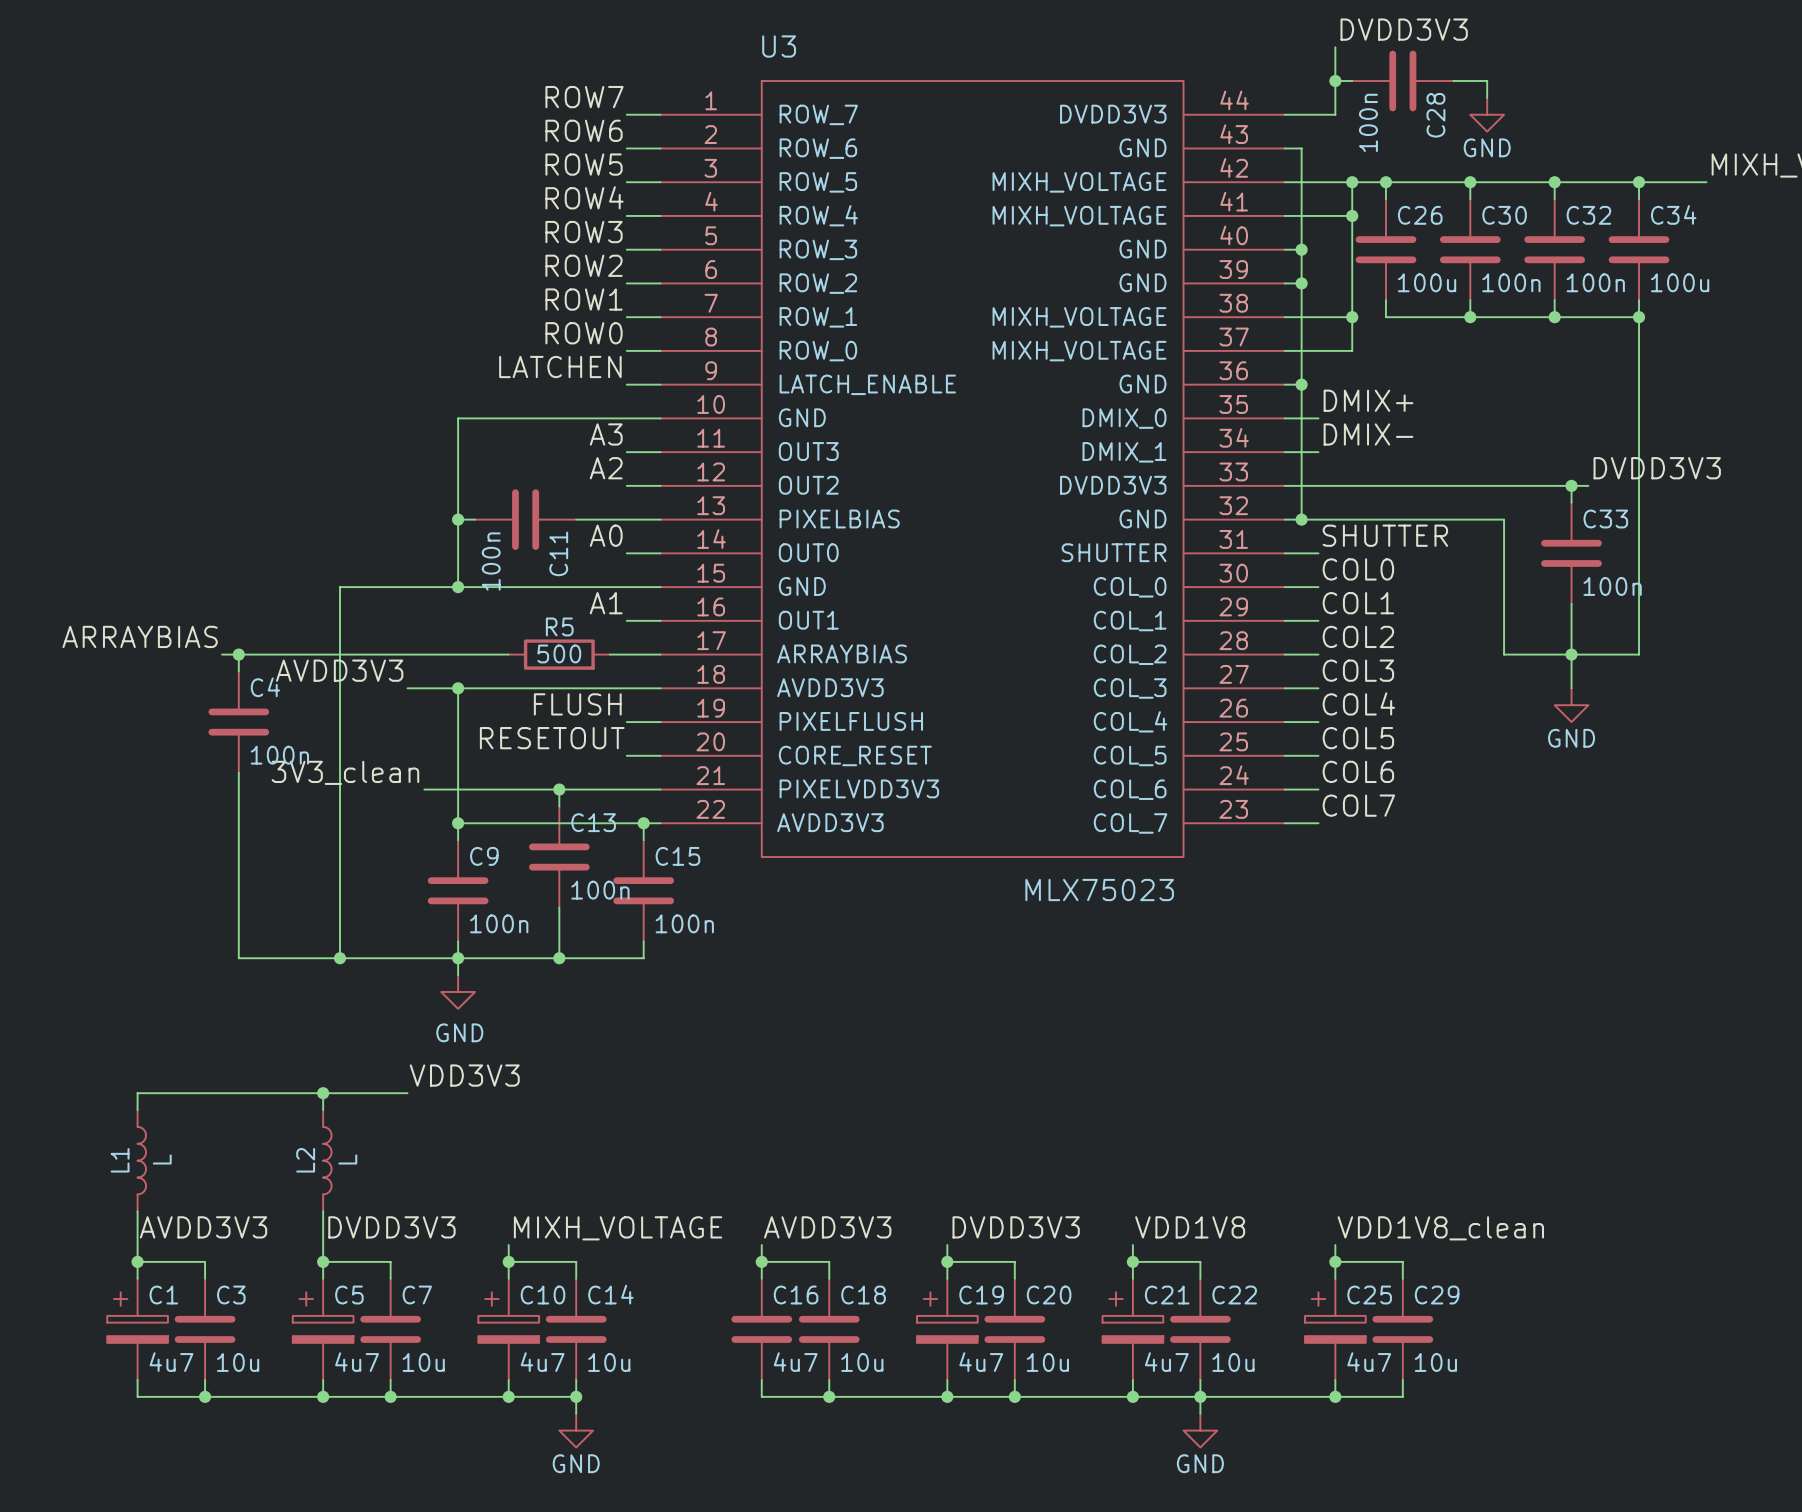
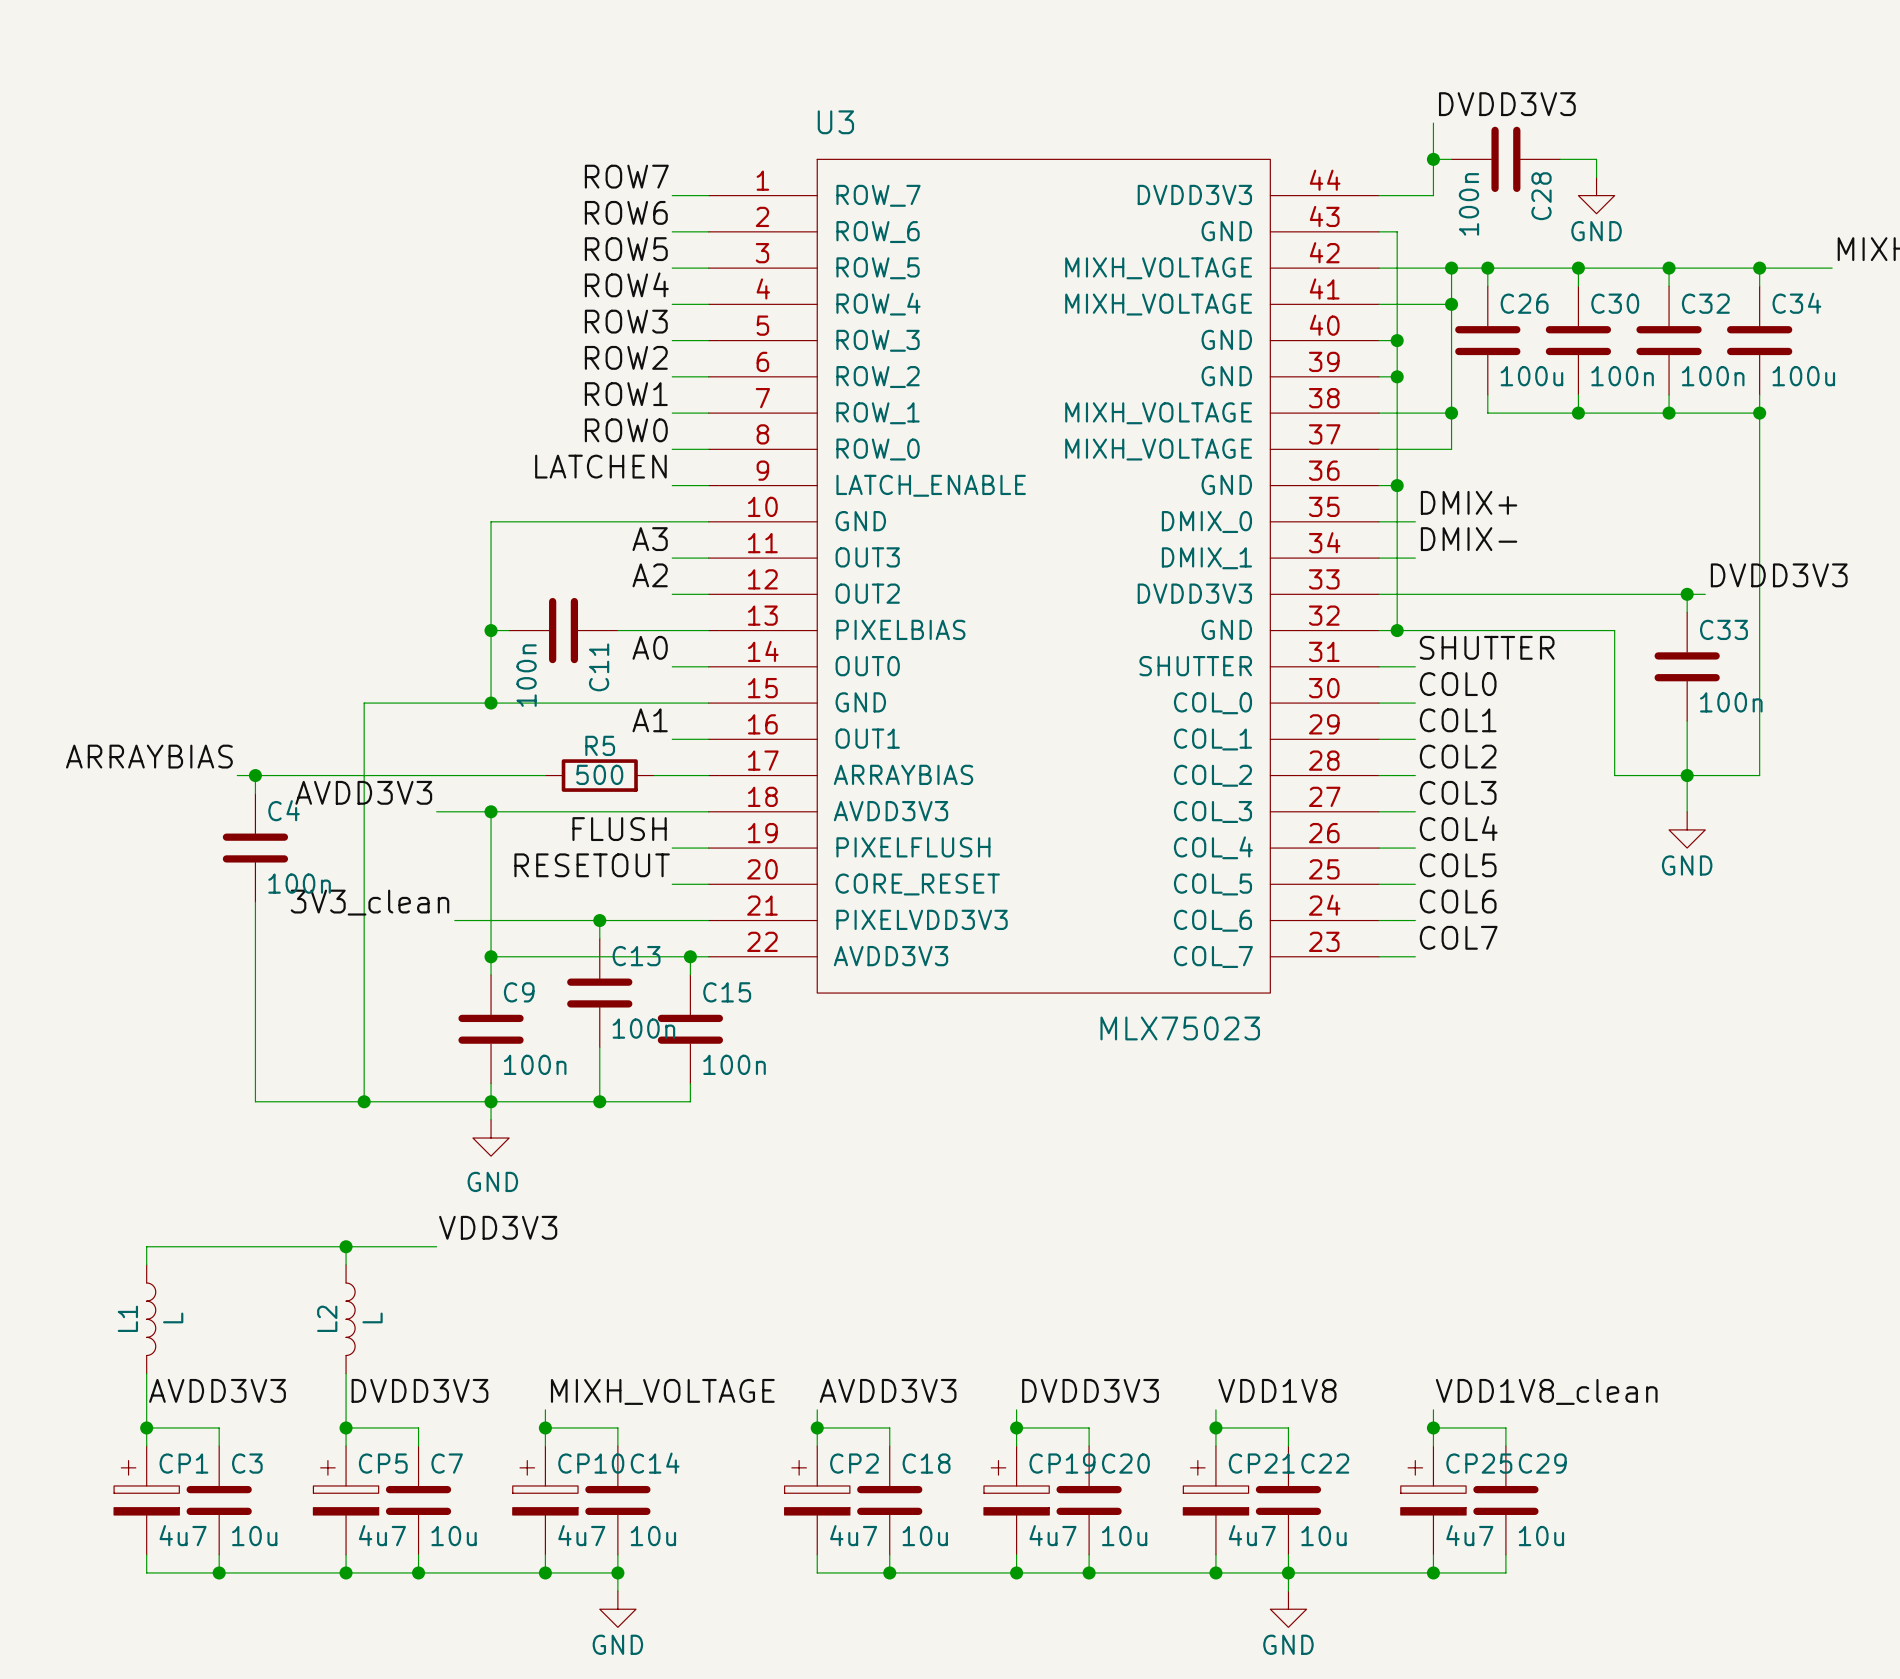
C1 name: C1 (163, 1295) -> CP1 (183, 1463)
C5 name: C5 (349, 1295) -> CP5 (383, 1463)
C10 name: C10 (542, 1295) -> CP10 (591, 1463)
C19 name: C19 (981, 1295) -> CP19 (1062, 1463)
C21 name: C21 (1167, 1295) -> CP21 (1261, 1463)
C25 name: C25 (1369, 1295) -> CP25 (1479, 1463)
C16: 4u7 (761, 1329) -> none
CP2: none -> 4u7 (817, 1500)

